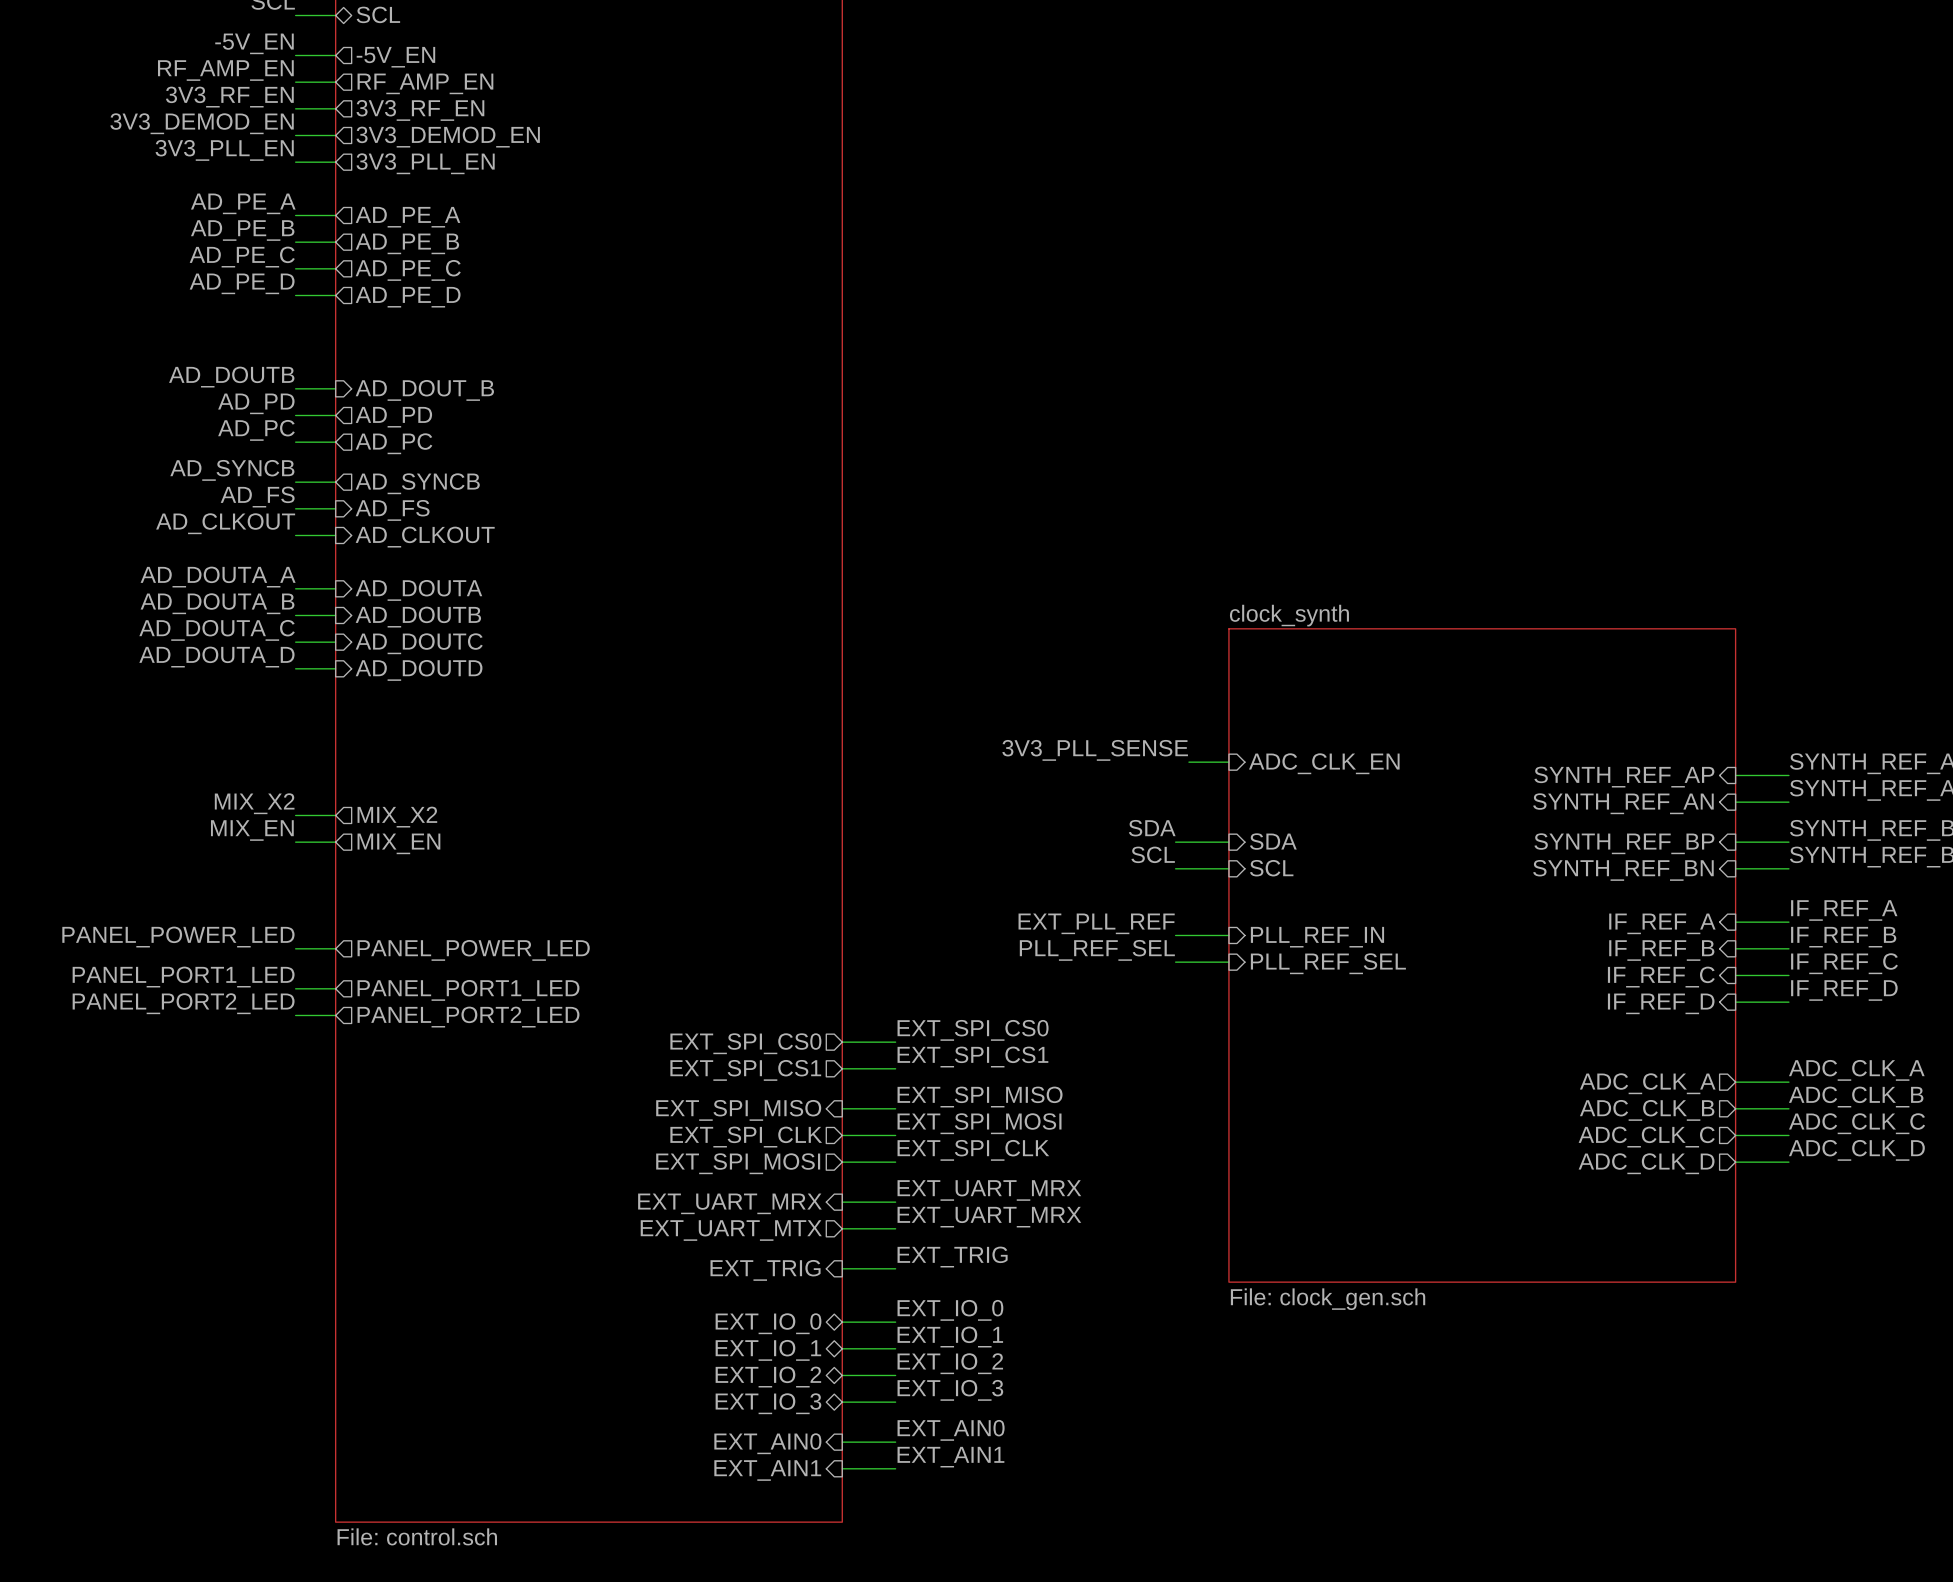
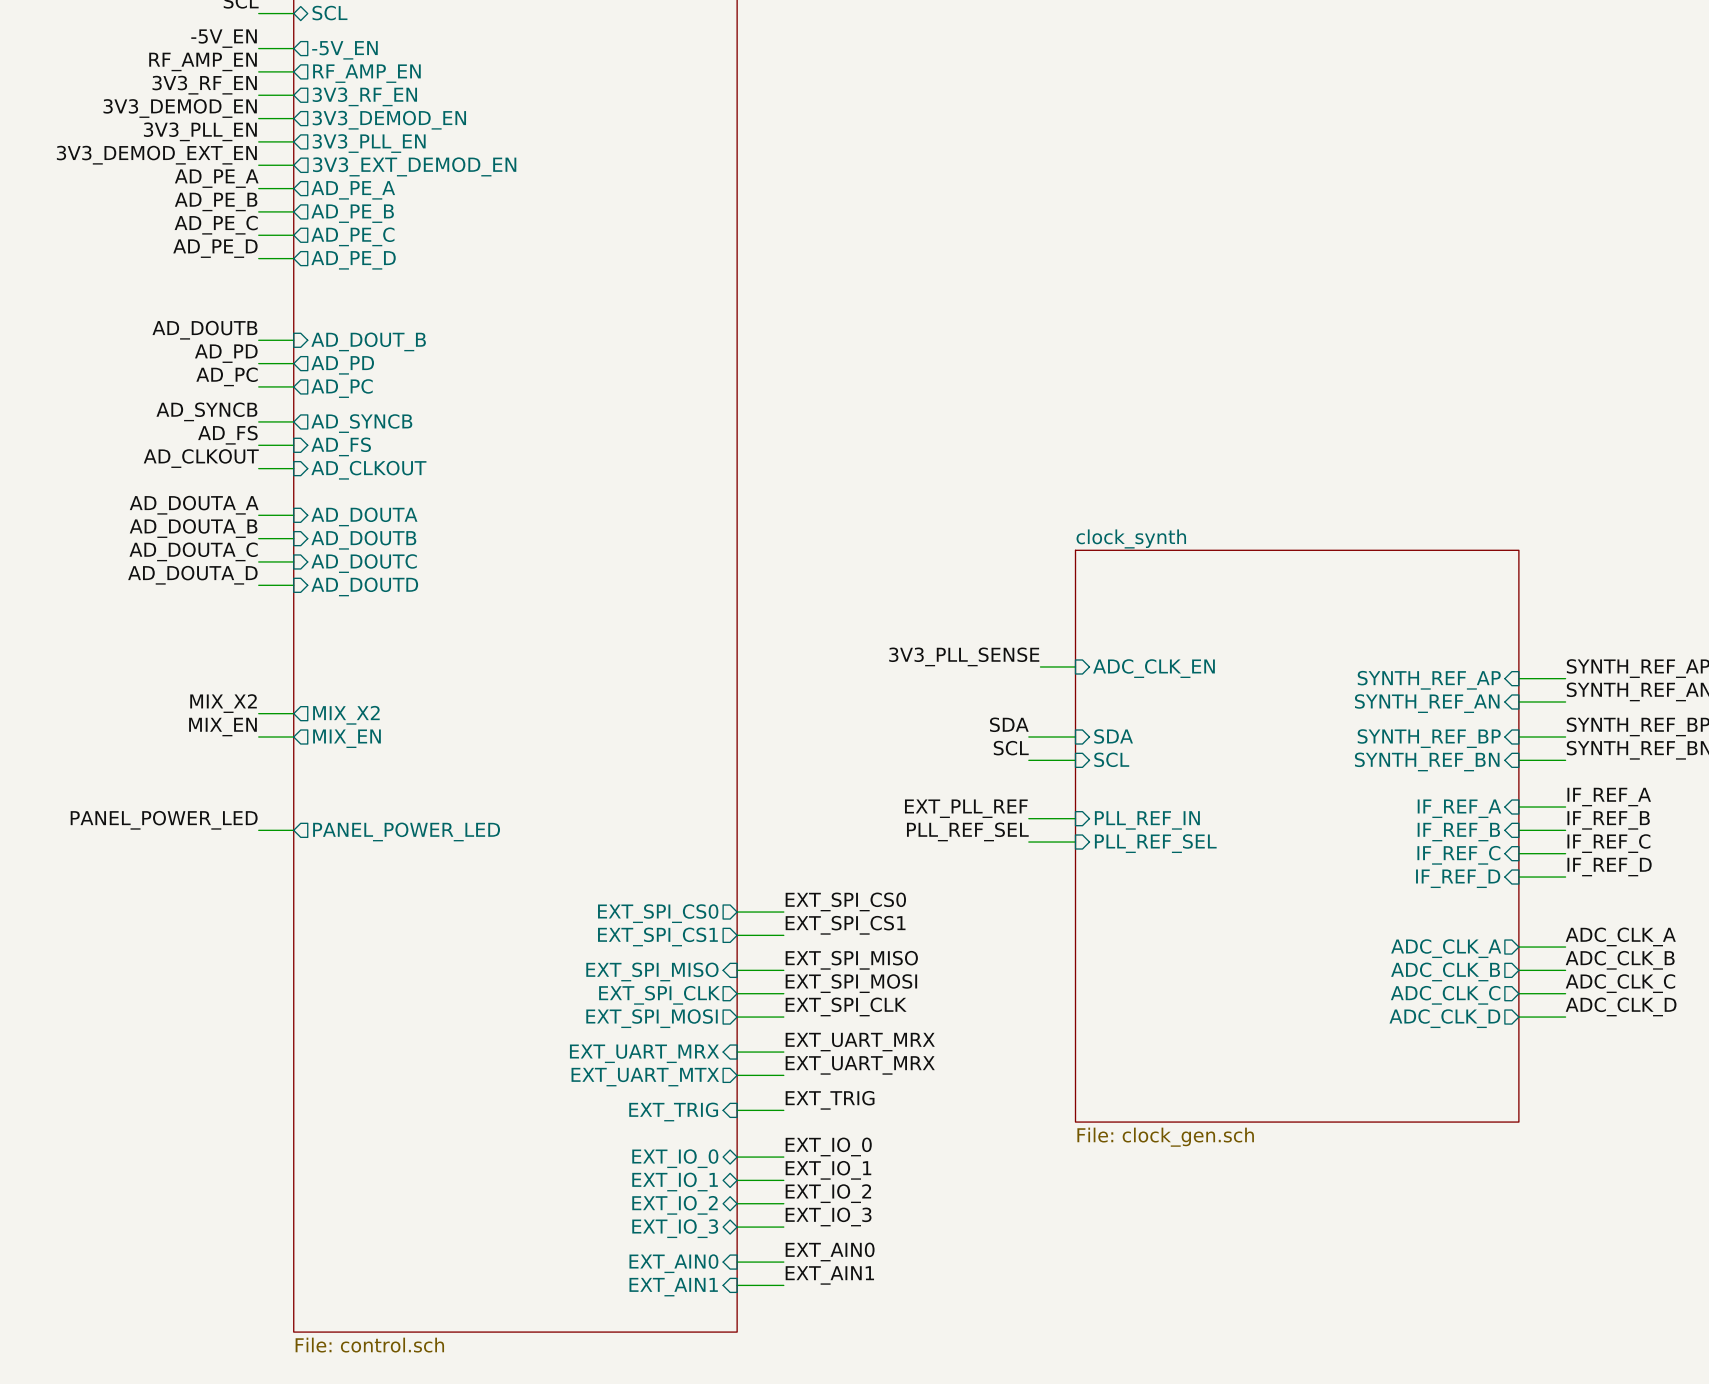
label: none -> 3V3_DEMOD_EXT_EN (156, 155)
wire: none -> (258, 165) (293, 165)
sheet pin: none -> 3V3_EXT_DEMOD_EN (414, 166)
label: PANEL_PORT1_LED (183, 977) -> none
wire: (295, 988) (335, 988) -> none
sheet pin: PANEL_PORT1_LED (468, 990) -> none
label: PANEL_PORT2_LED (183, 1003) -> none
wire: (295, 1015) (335, 1015) -> none
sheet pin: PANEL_PORT2_LED (468, 1017) -> none

